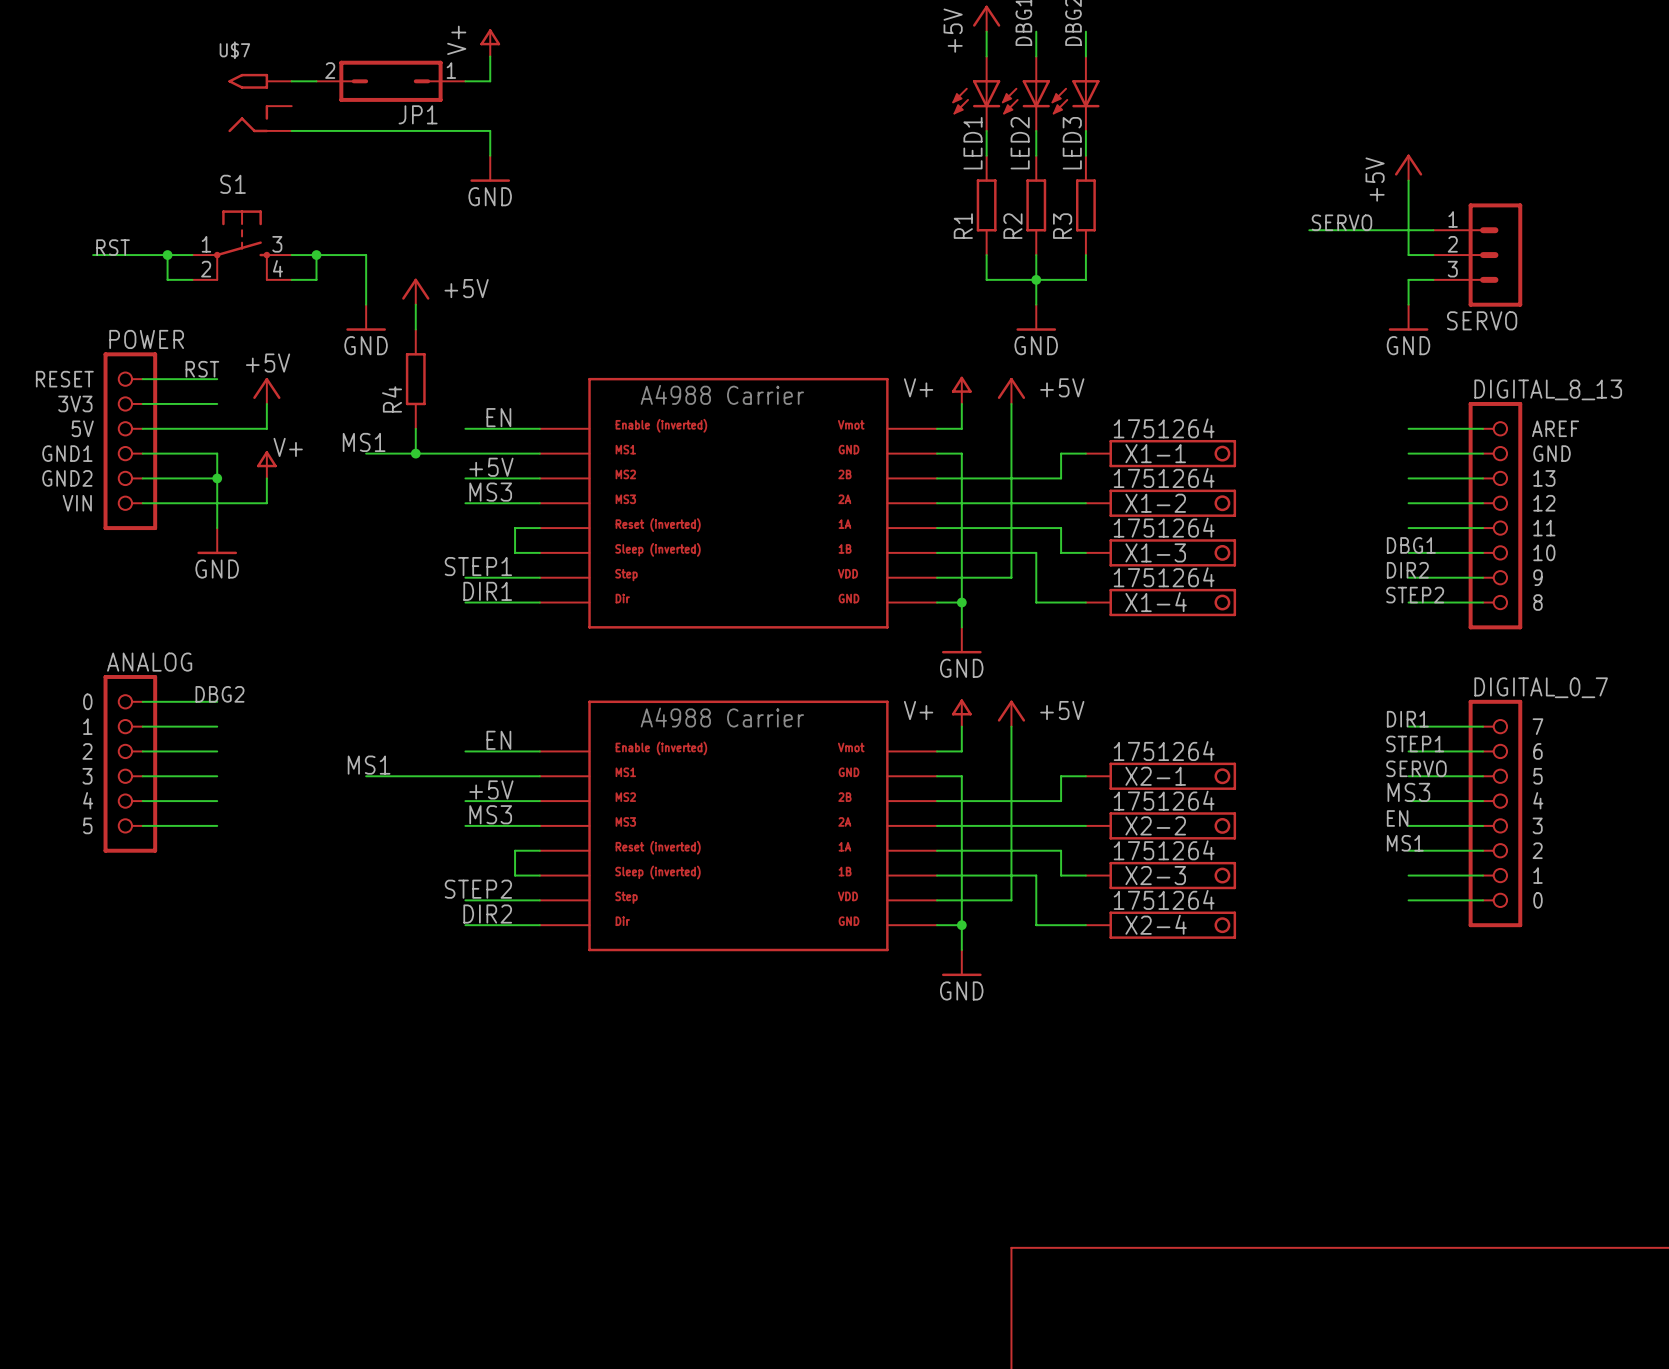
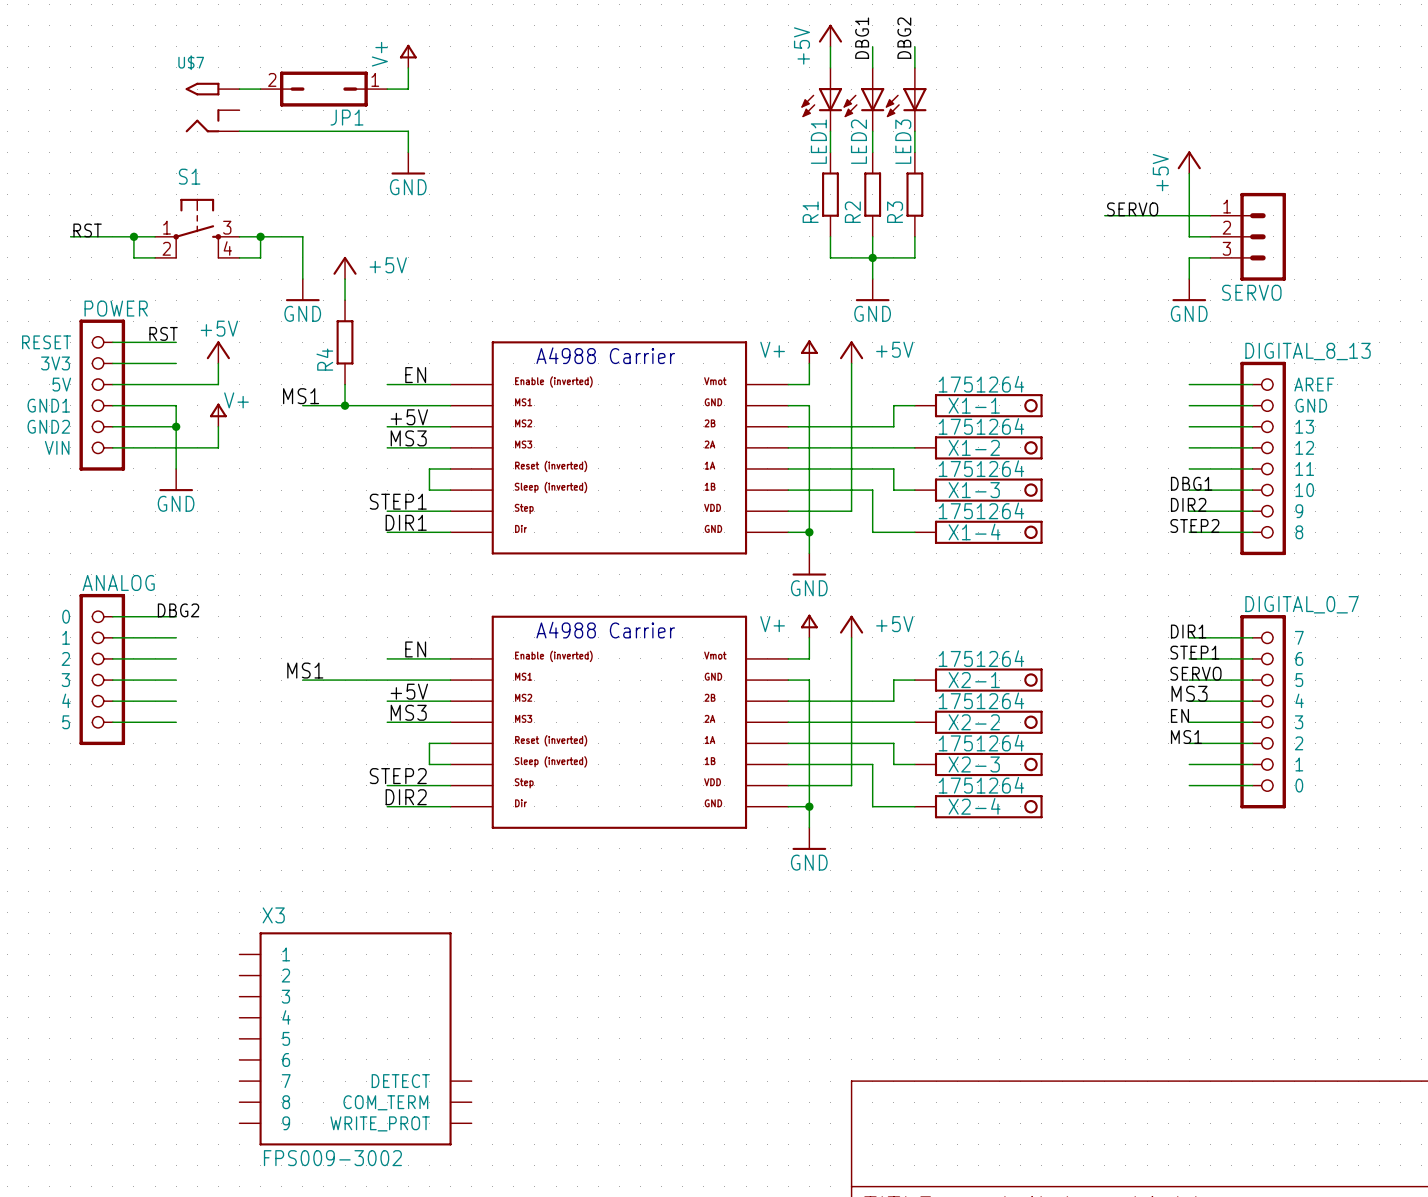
X3: none -> FPS009-3002 (355, 1038)

